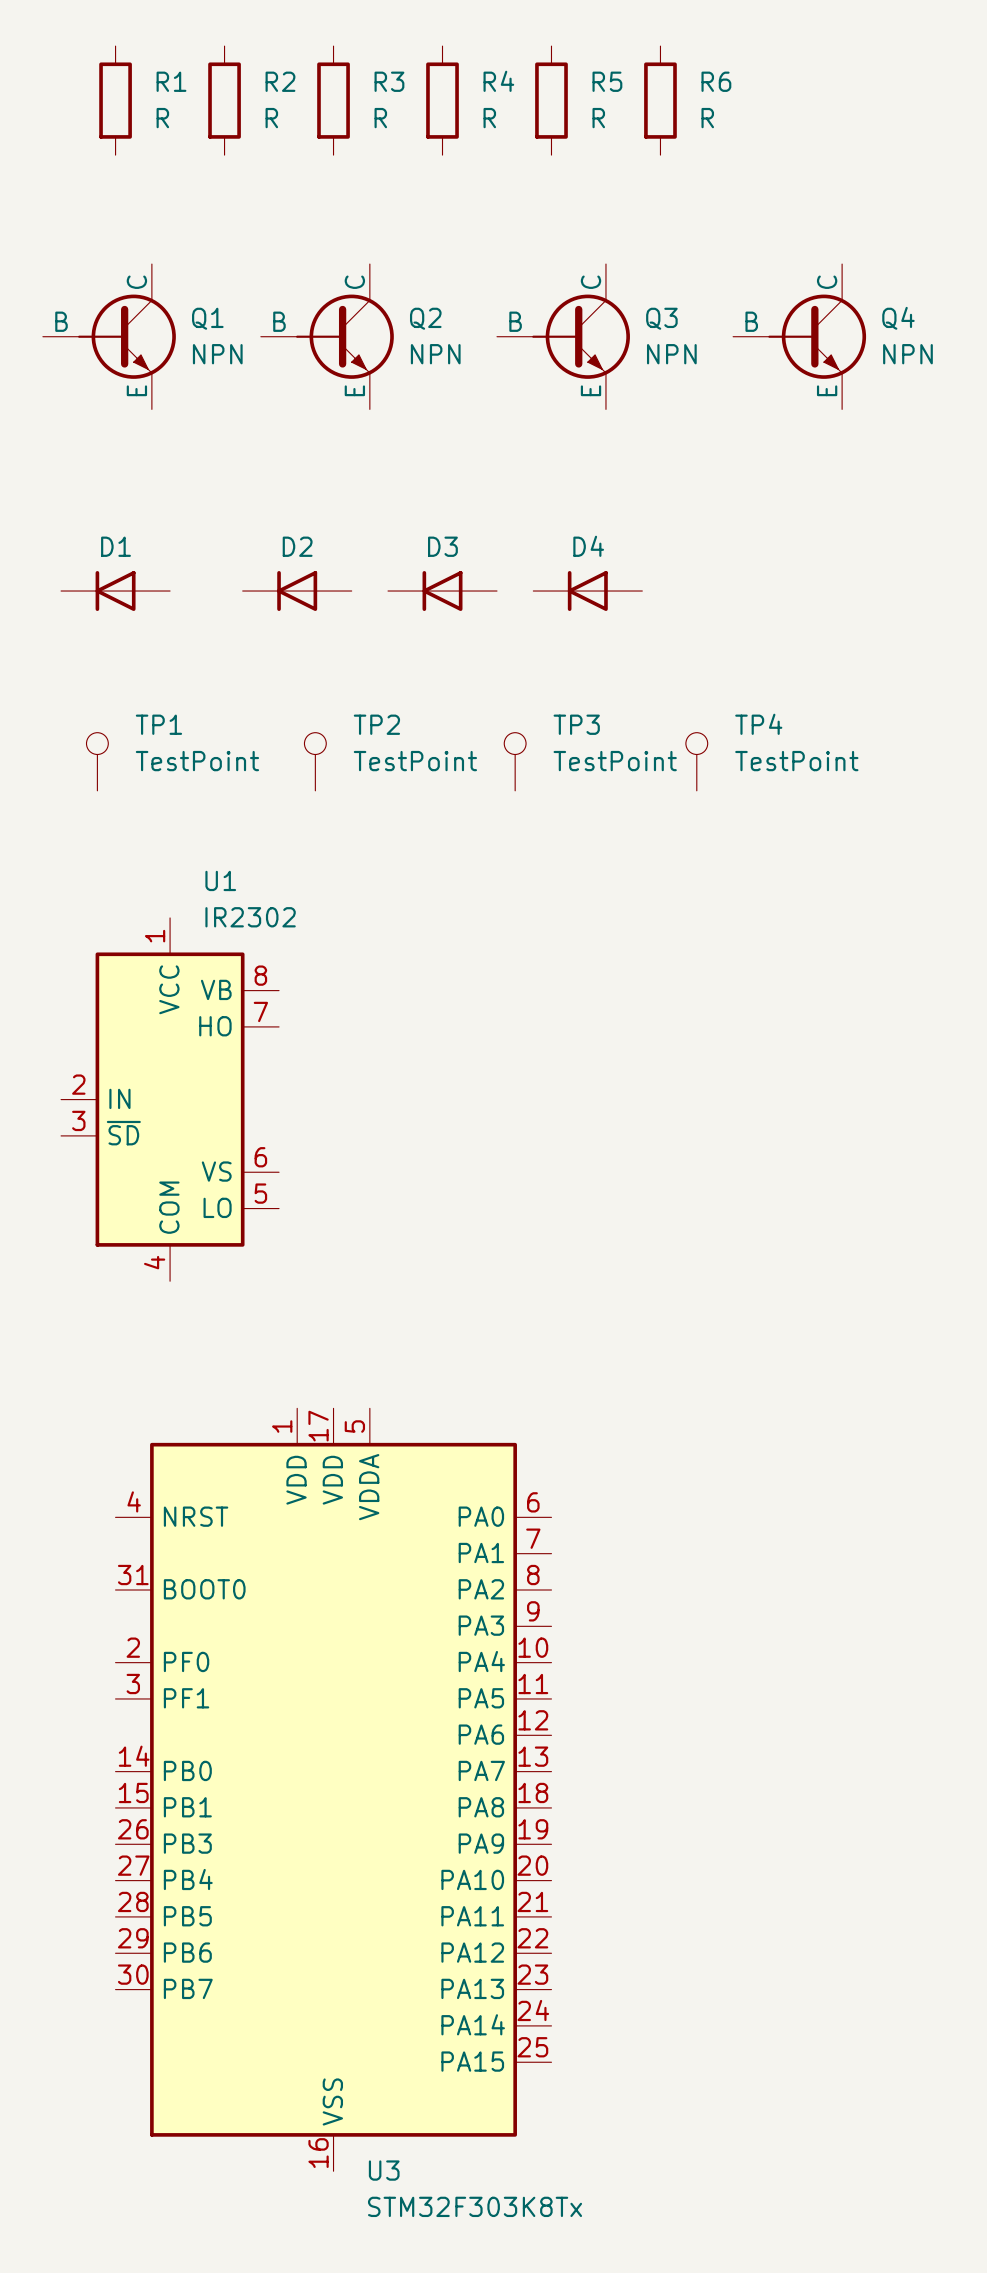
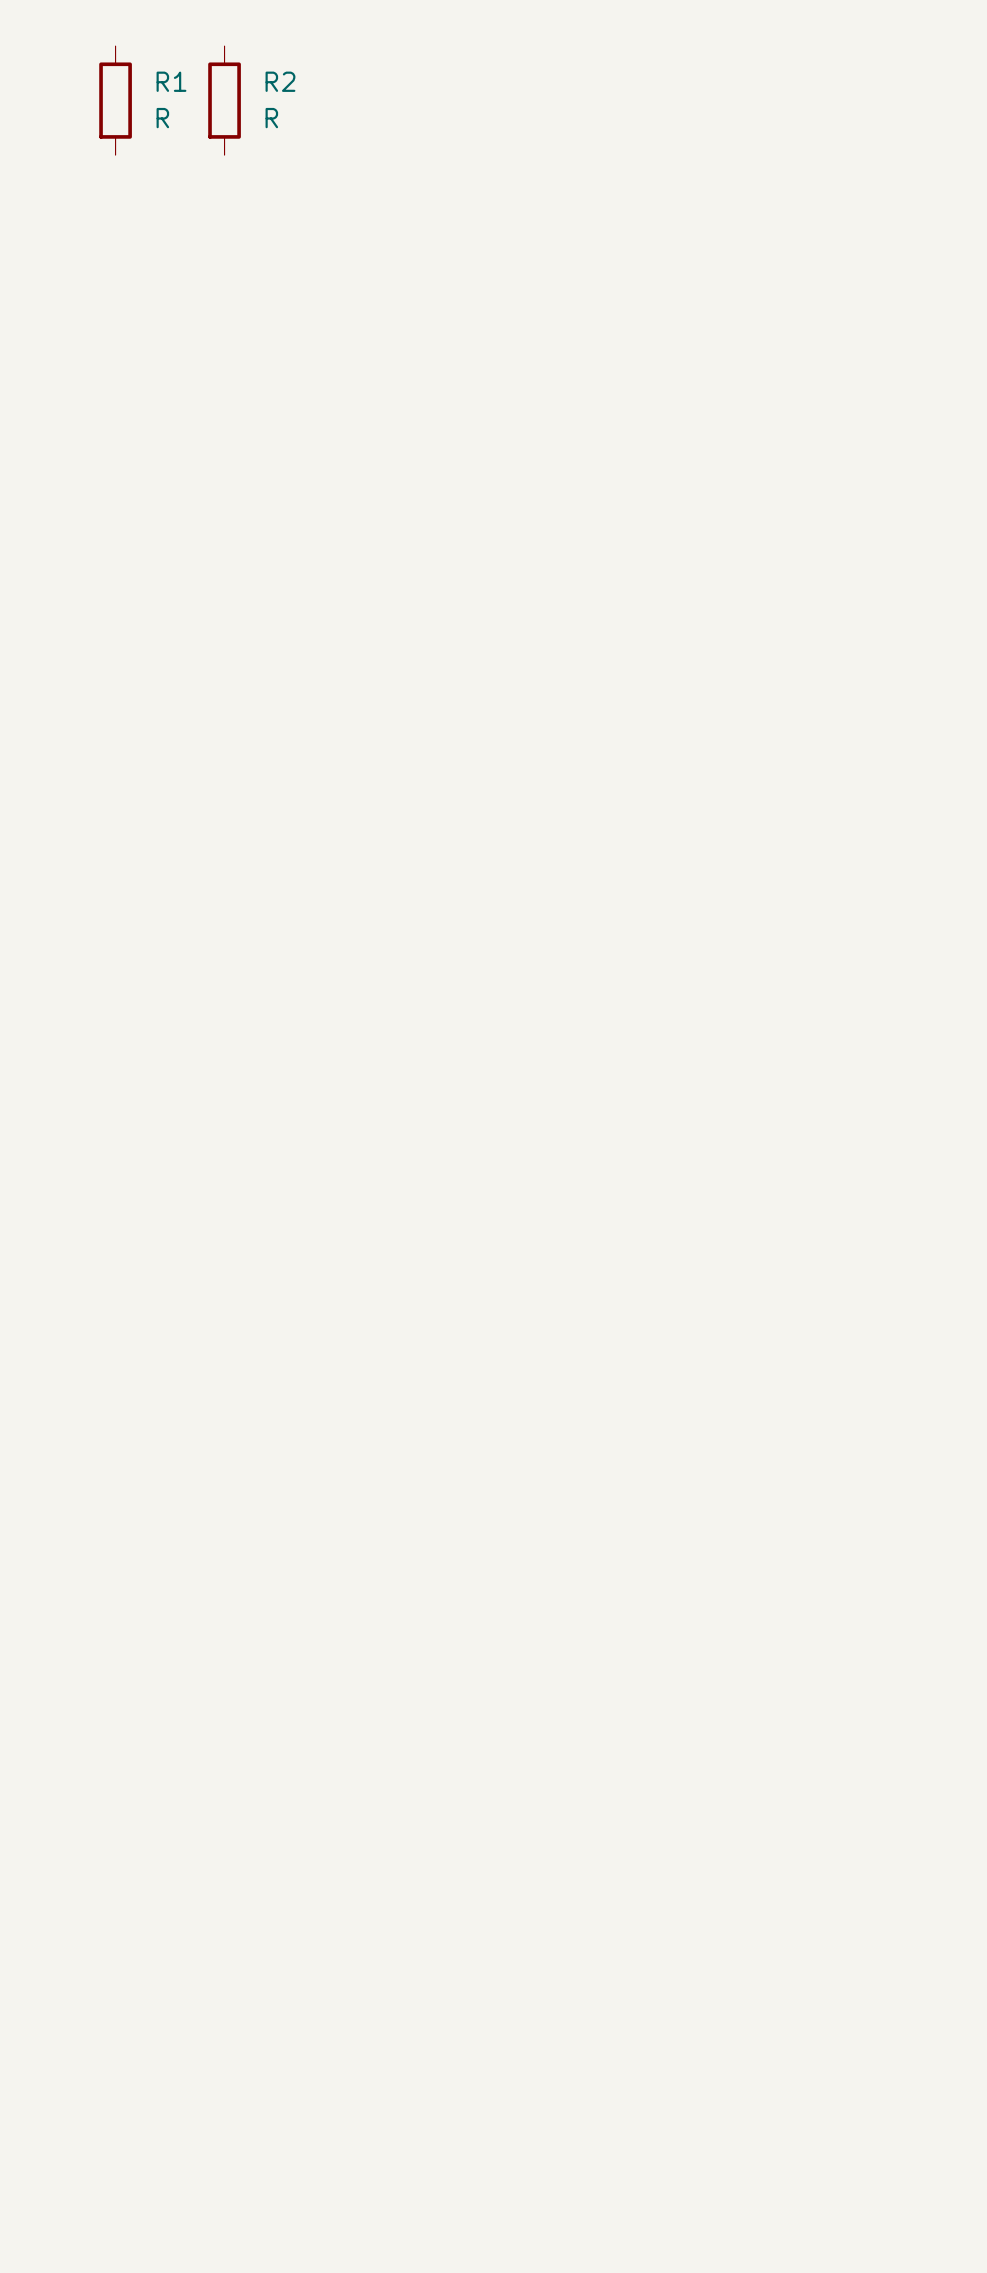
R3: R (333, 100) -> none
R4: R (442, 100) -> none
R5: R (551, 100) -> none
R6: R (660, 100) -> none
Q1: NPN (109, 336) -> none
Q2: NPN (327, 336) -> none
Q3: NPN (563, 336) -> none
Q4: NPN (799, 336) -> none
D1: (115, 591) -> none
D2: (297, 591) -> none
D3: (442, 591) -> none
D4: (587, 591) -> none
TP1: TestPoint (97, 761) -> none
TP2: TestPoint (315, 761) -> none
TP3: TestPoint (515, 761) -> none
TP4: TestPoint (696, 761) -> none
U1: IR2302 (170, 1099) -> none
U3: STM32F303K8Tx (333, 1789) -> none

